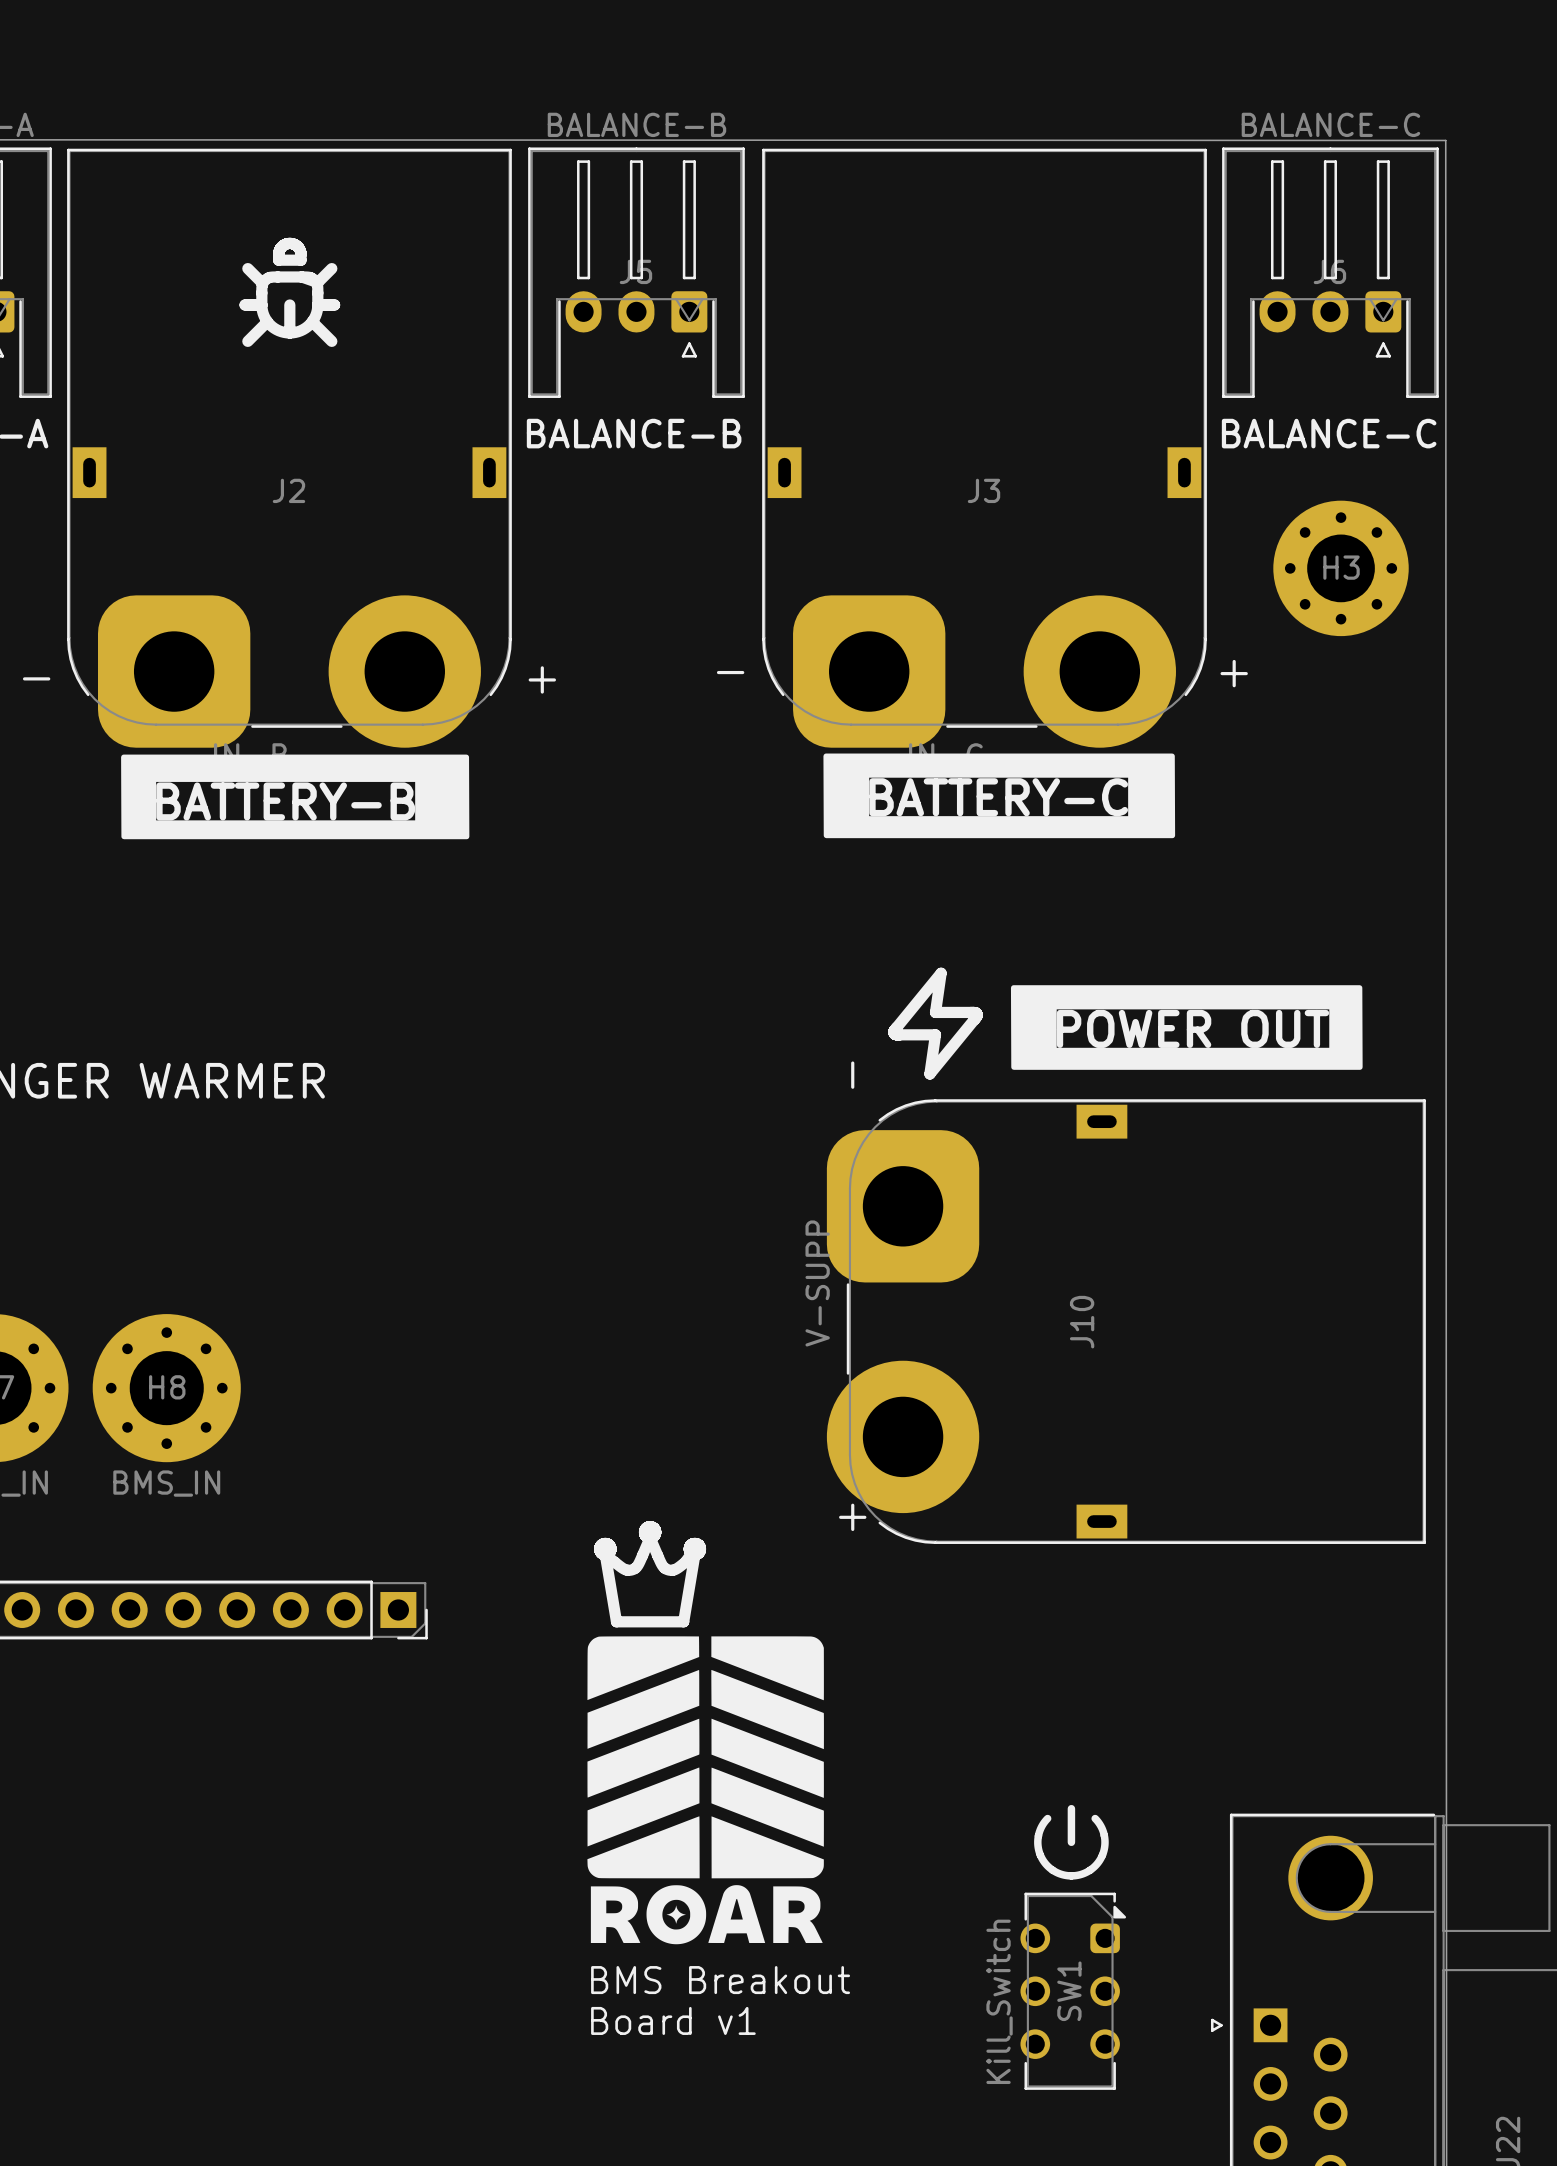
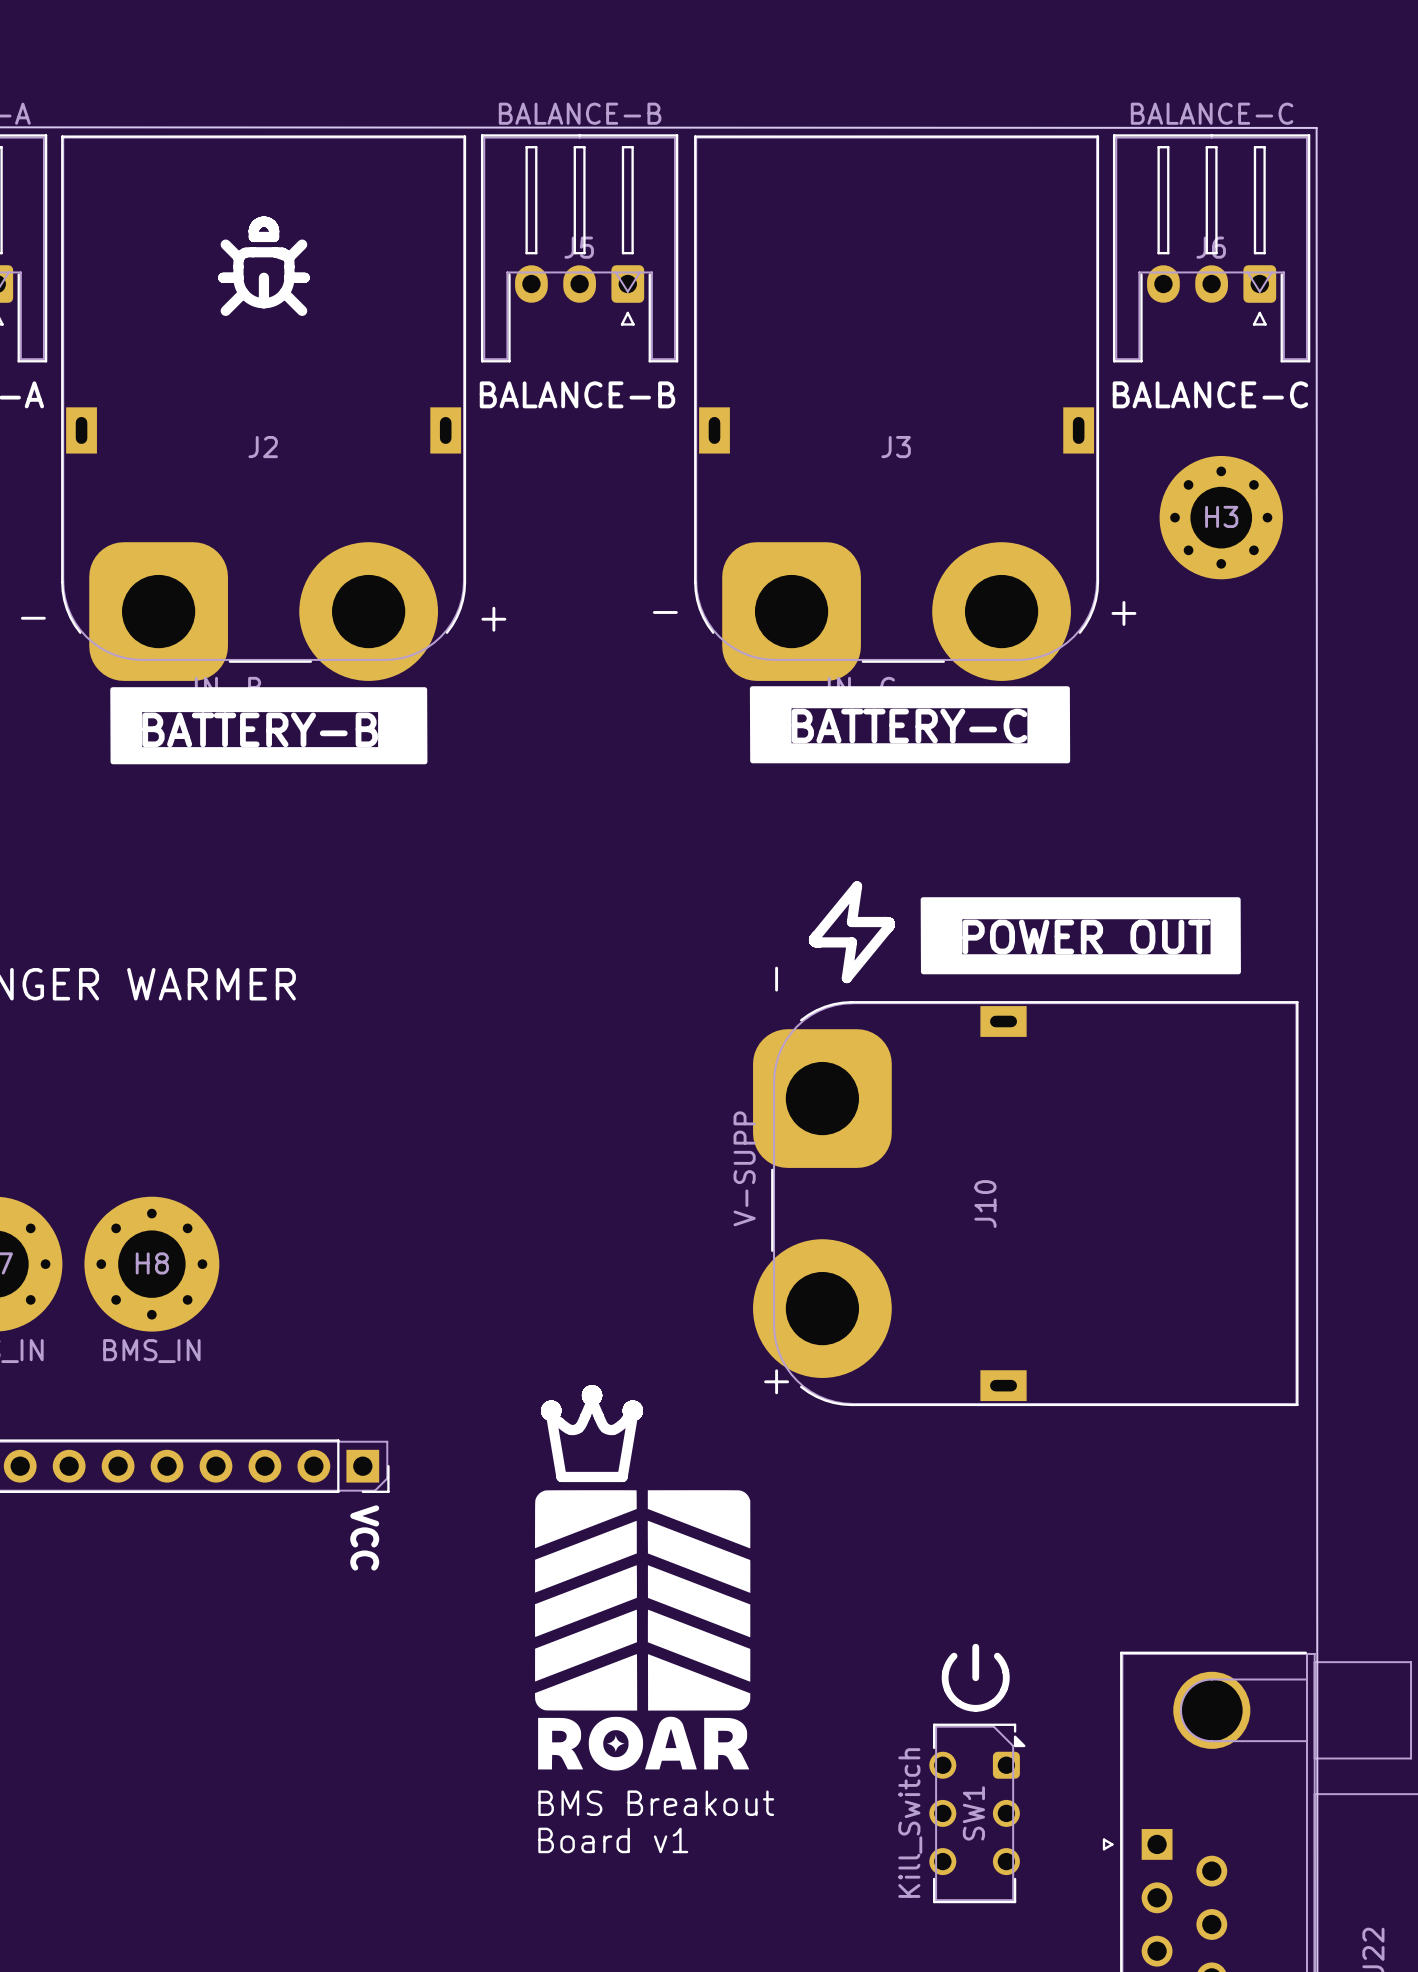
text: none -> VCC (364, 1537)

